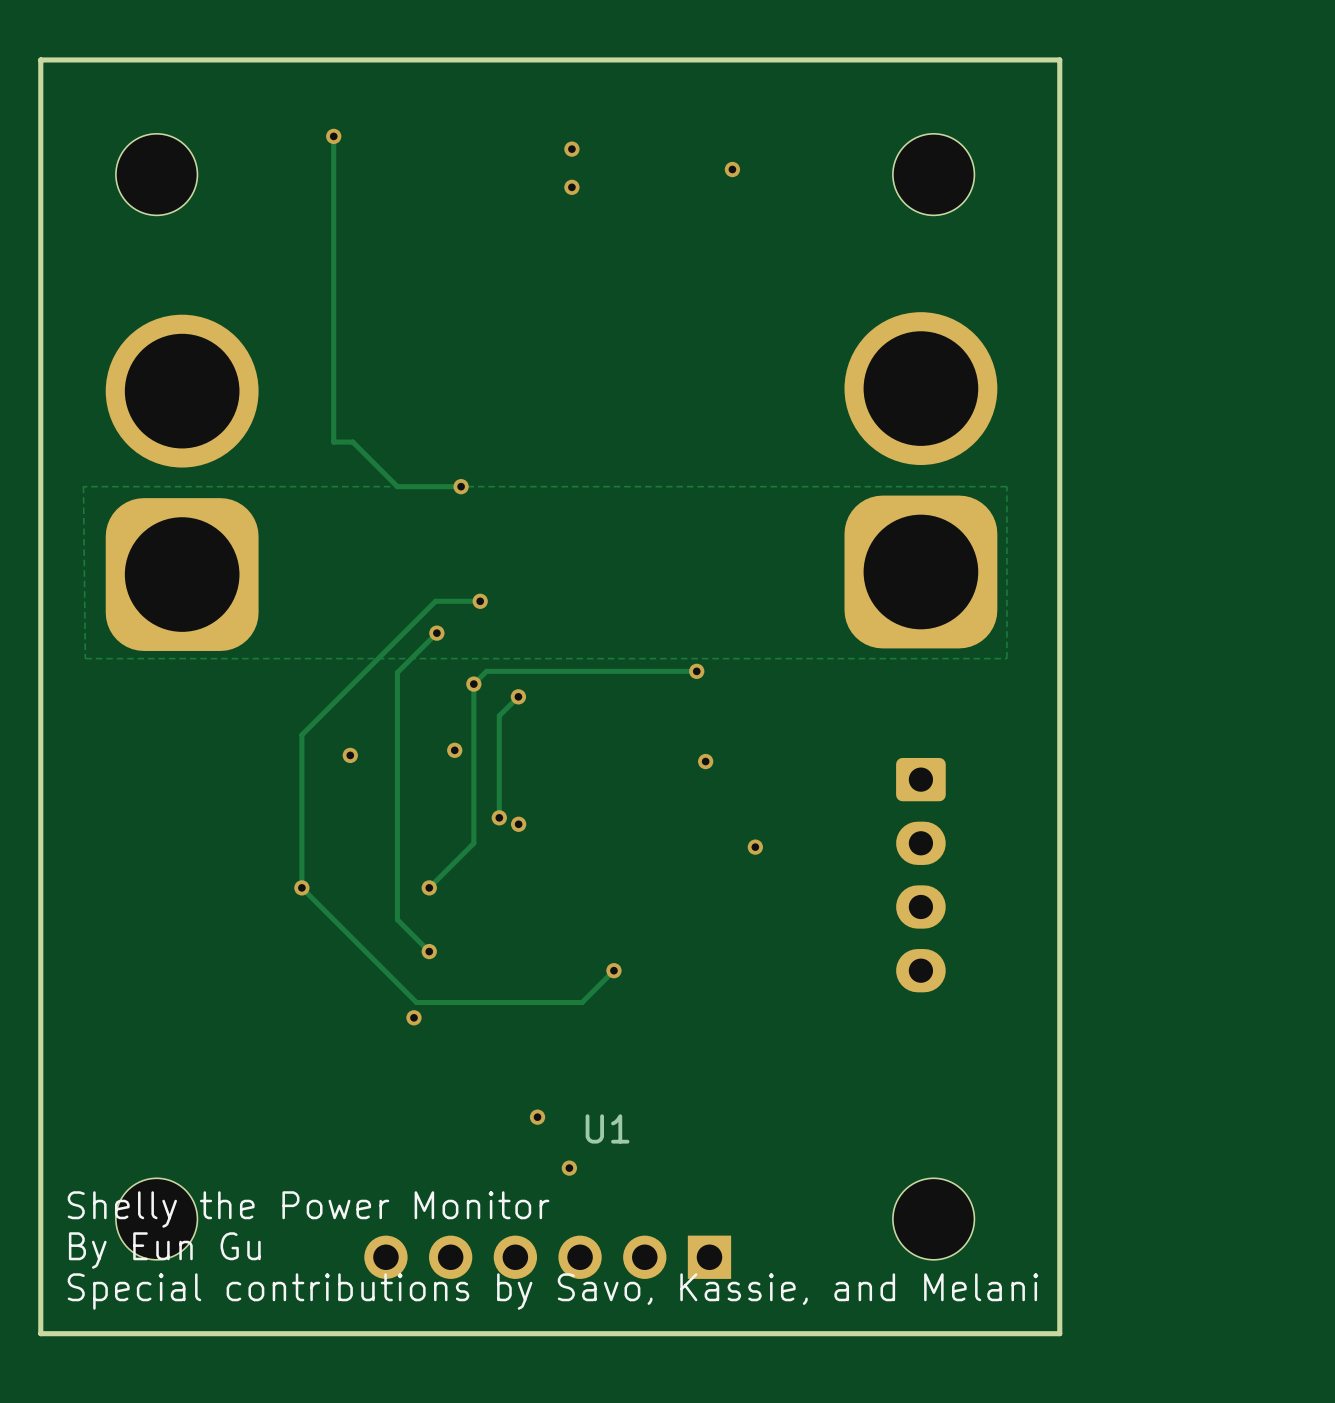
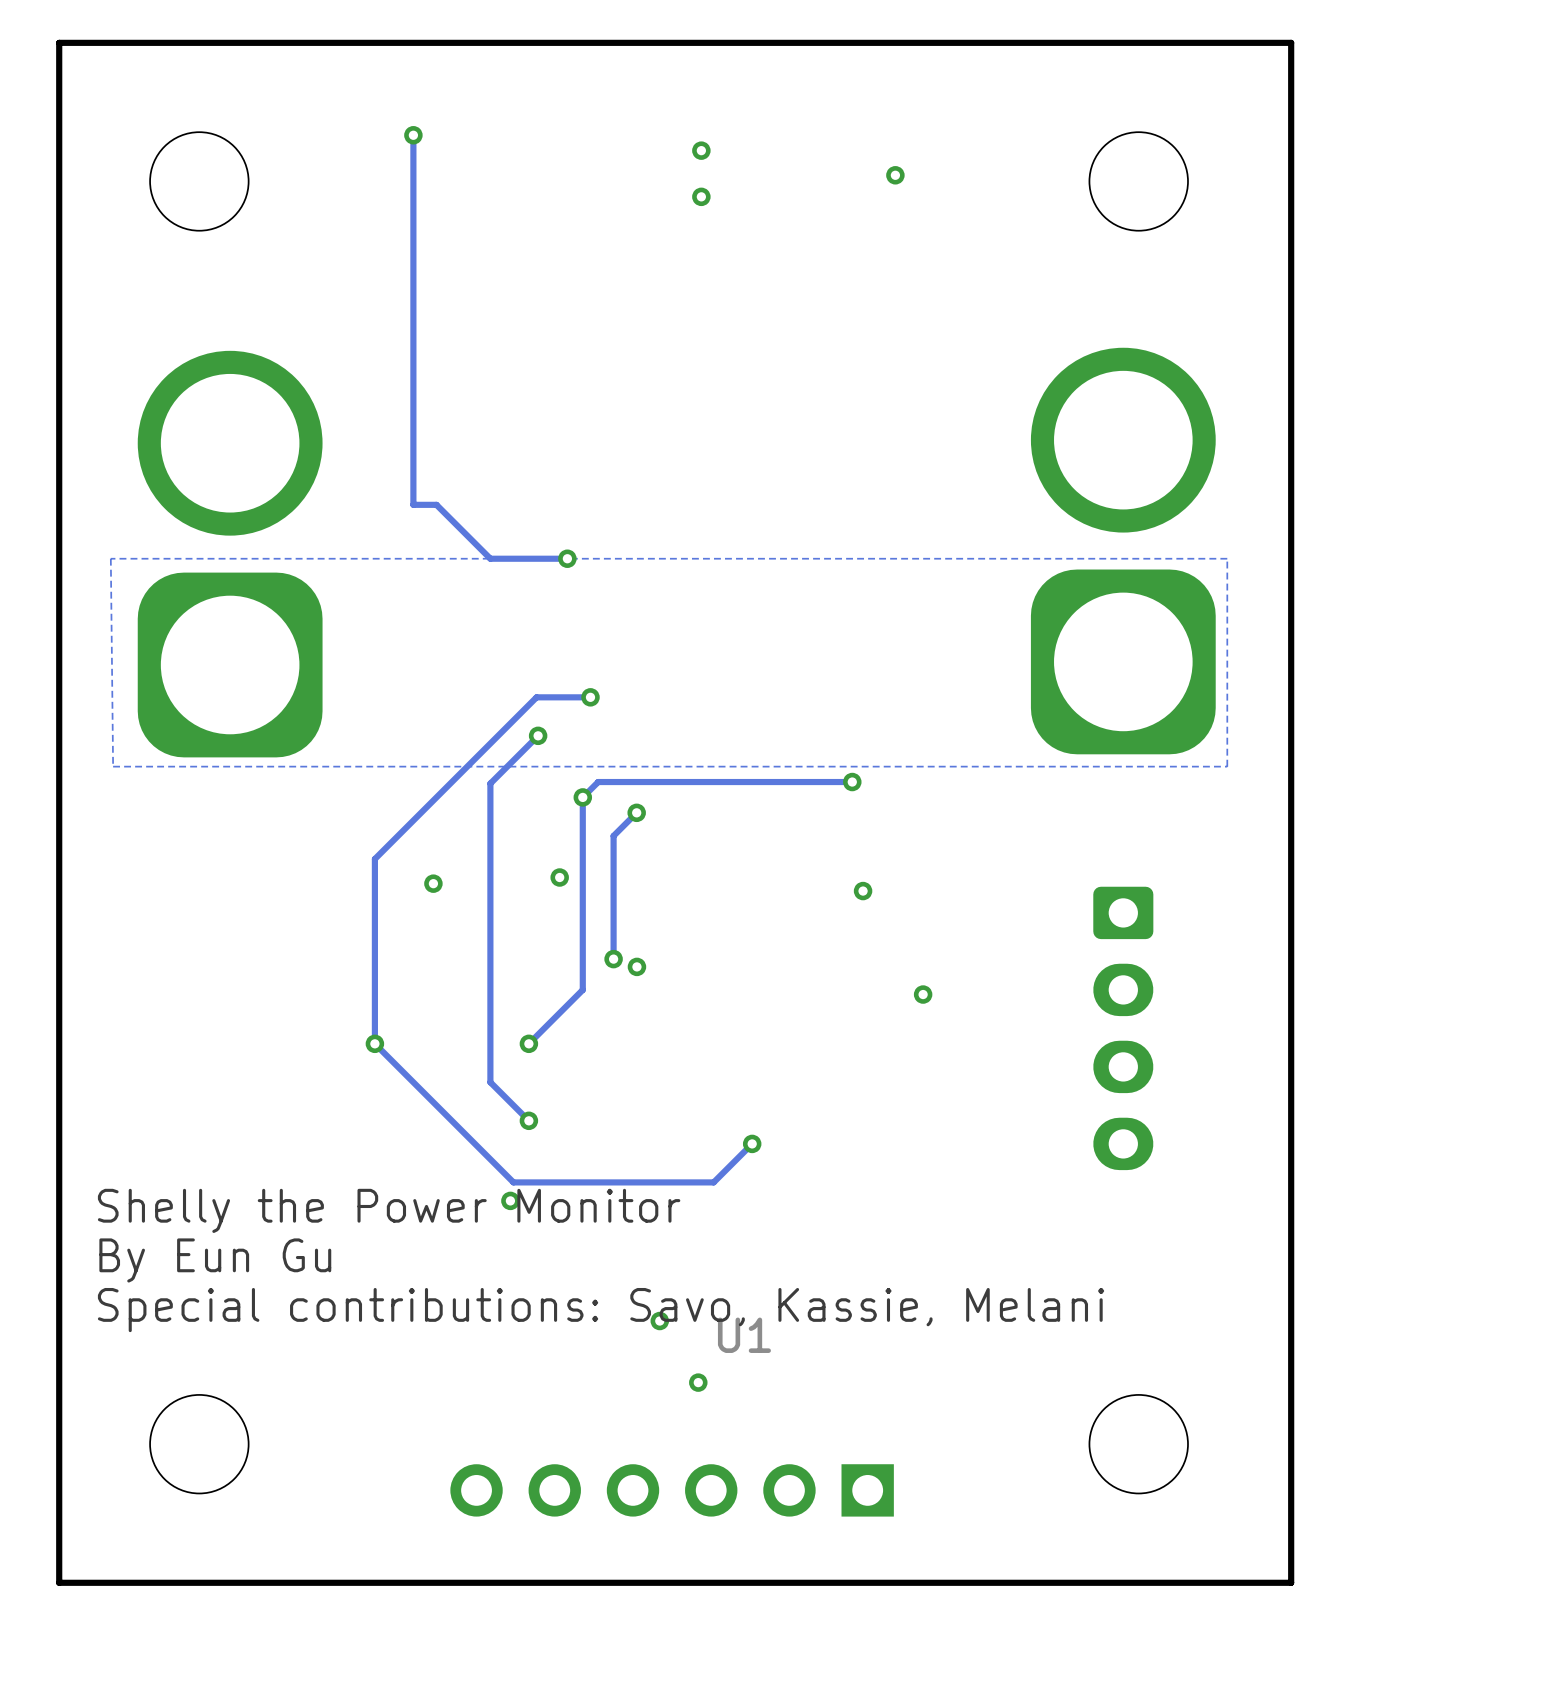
text: none -> Special contributions: Savo, Kassie, Melani (601, 1310)
text position: Shelly the Power Monitor (308, 1209) -> Shelly the Power Monitor (389, 1210)
text position: By Eun Gu (164, 1250) -> By Eun Gu (215, 1260)
text: Special contributions by Savo, Kassie, and Melani (552, 1291) -> none

